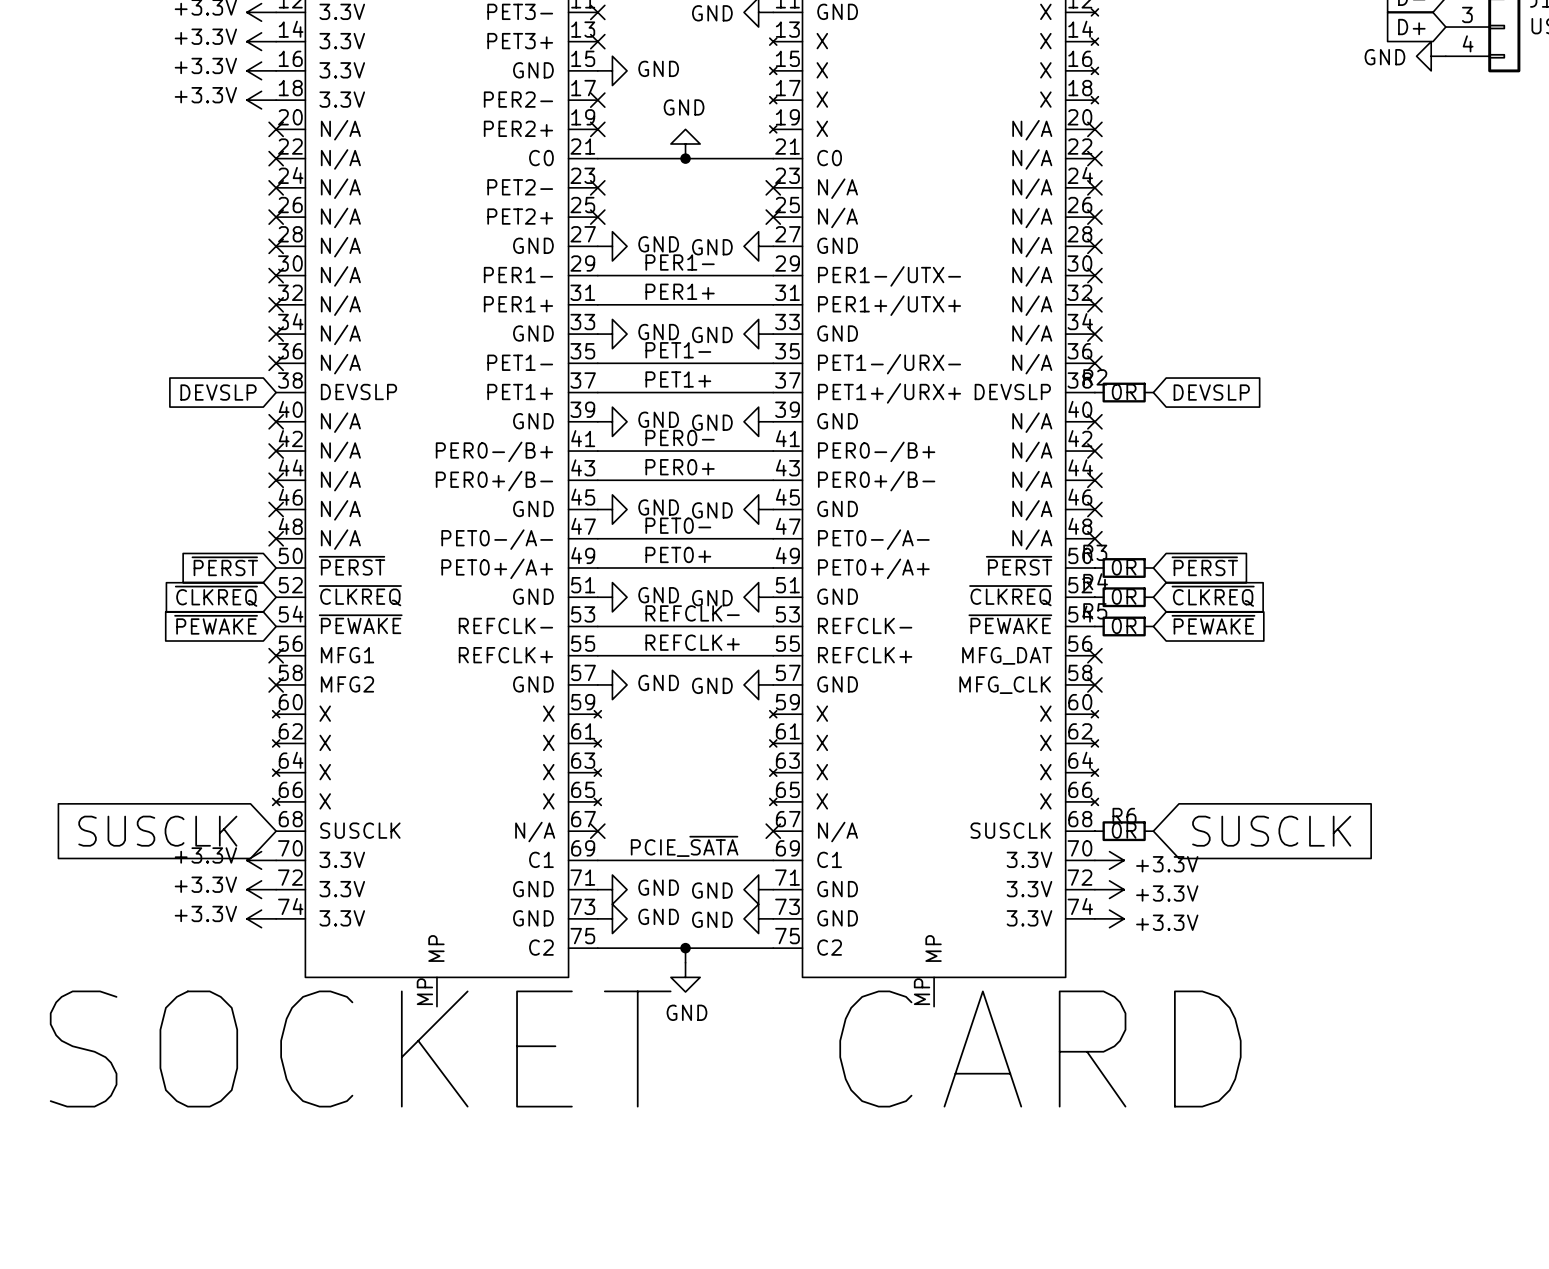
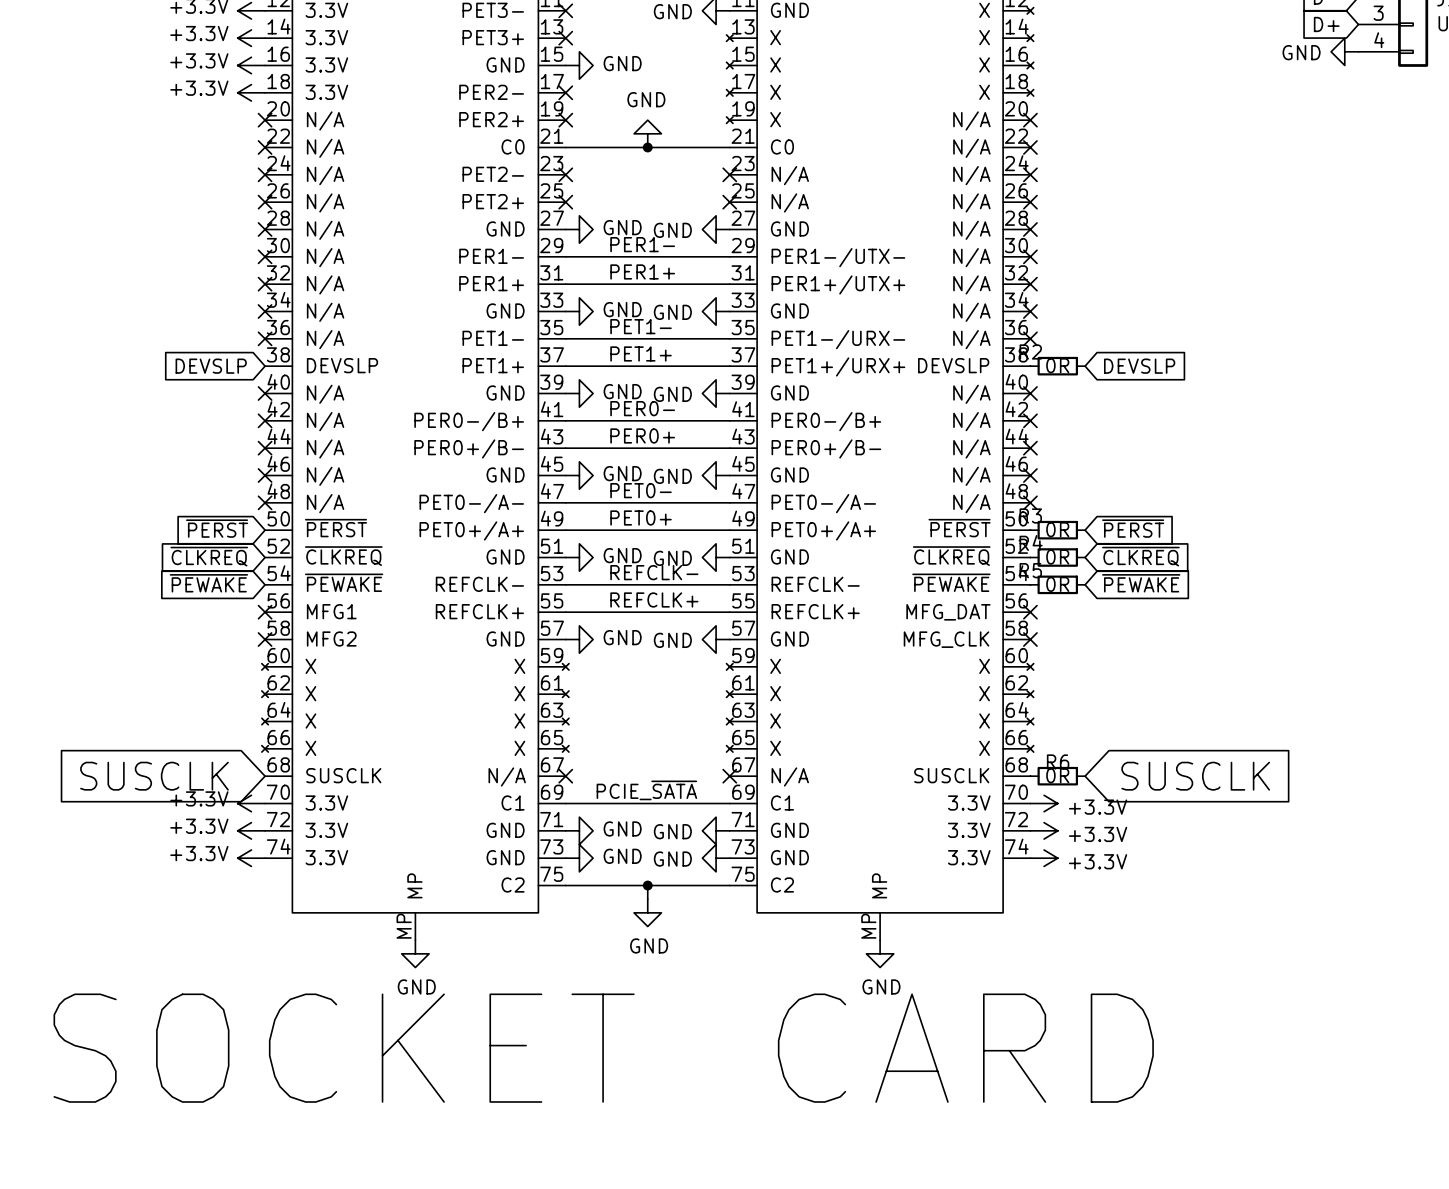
power symbol: none -> GND (415, 953)
power symbol: none -> GND (880, 953)
text position: SOCKET (360, 1049) -> SOCKET (344, 1048)
text position: CARD (1040, 1049) -> CARD (965, 1048)

